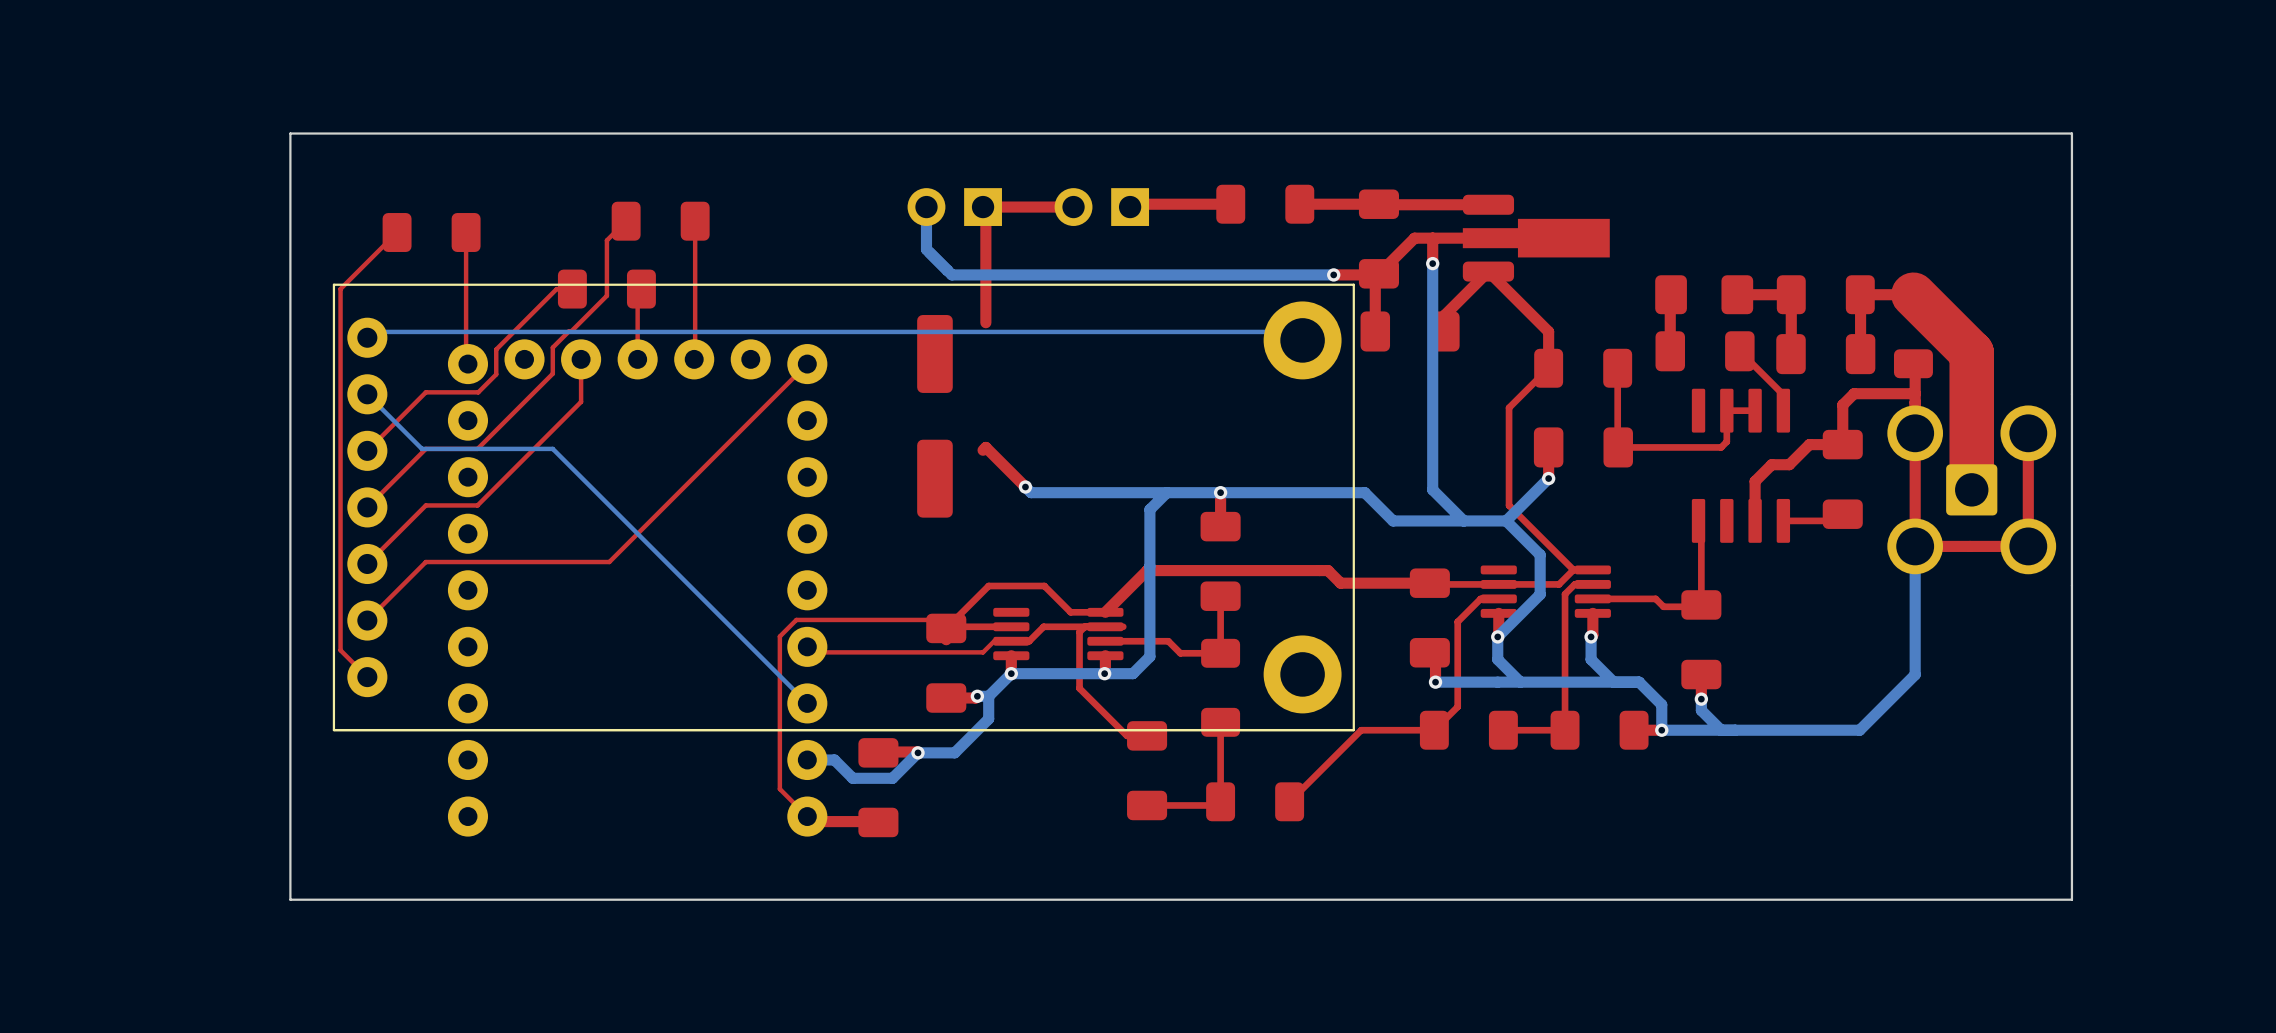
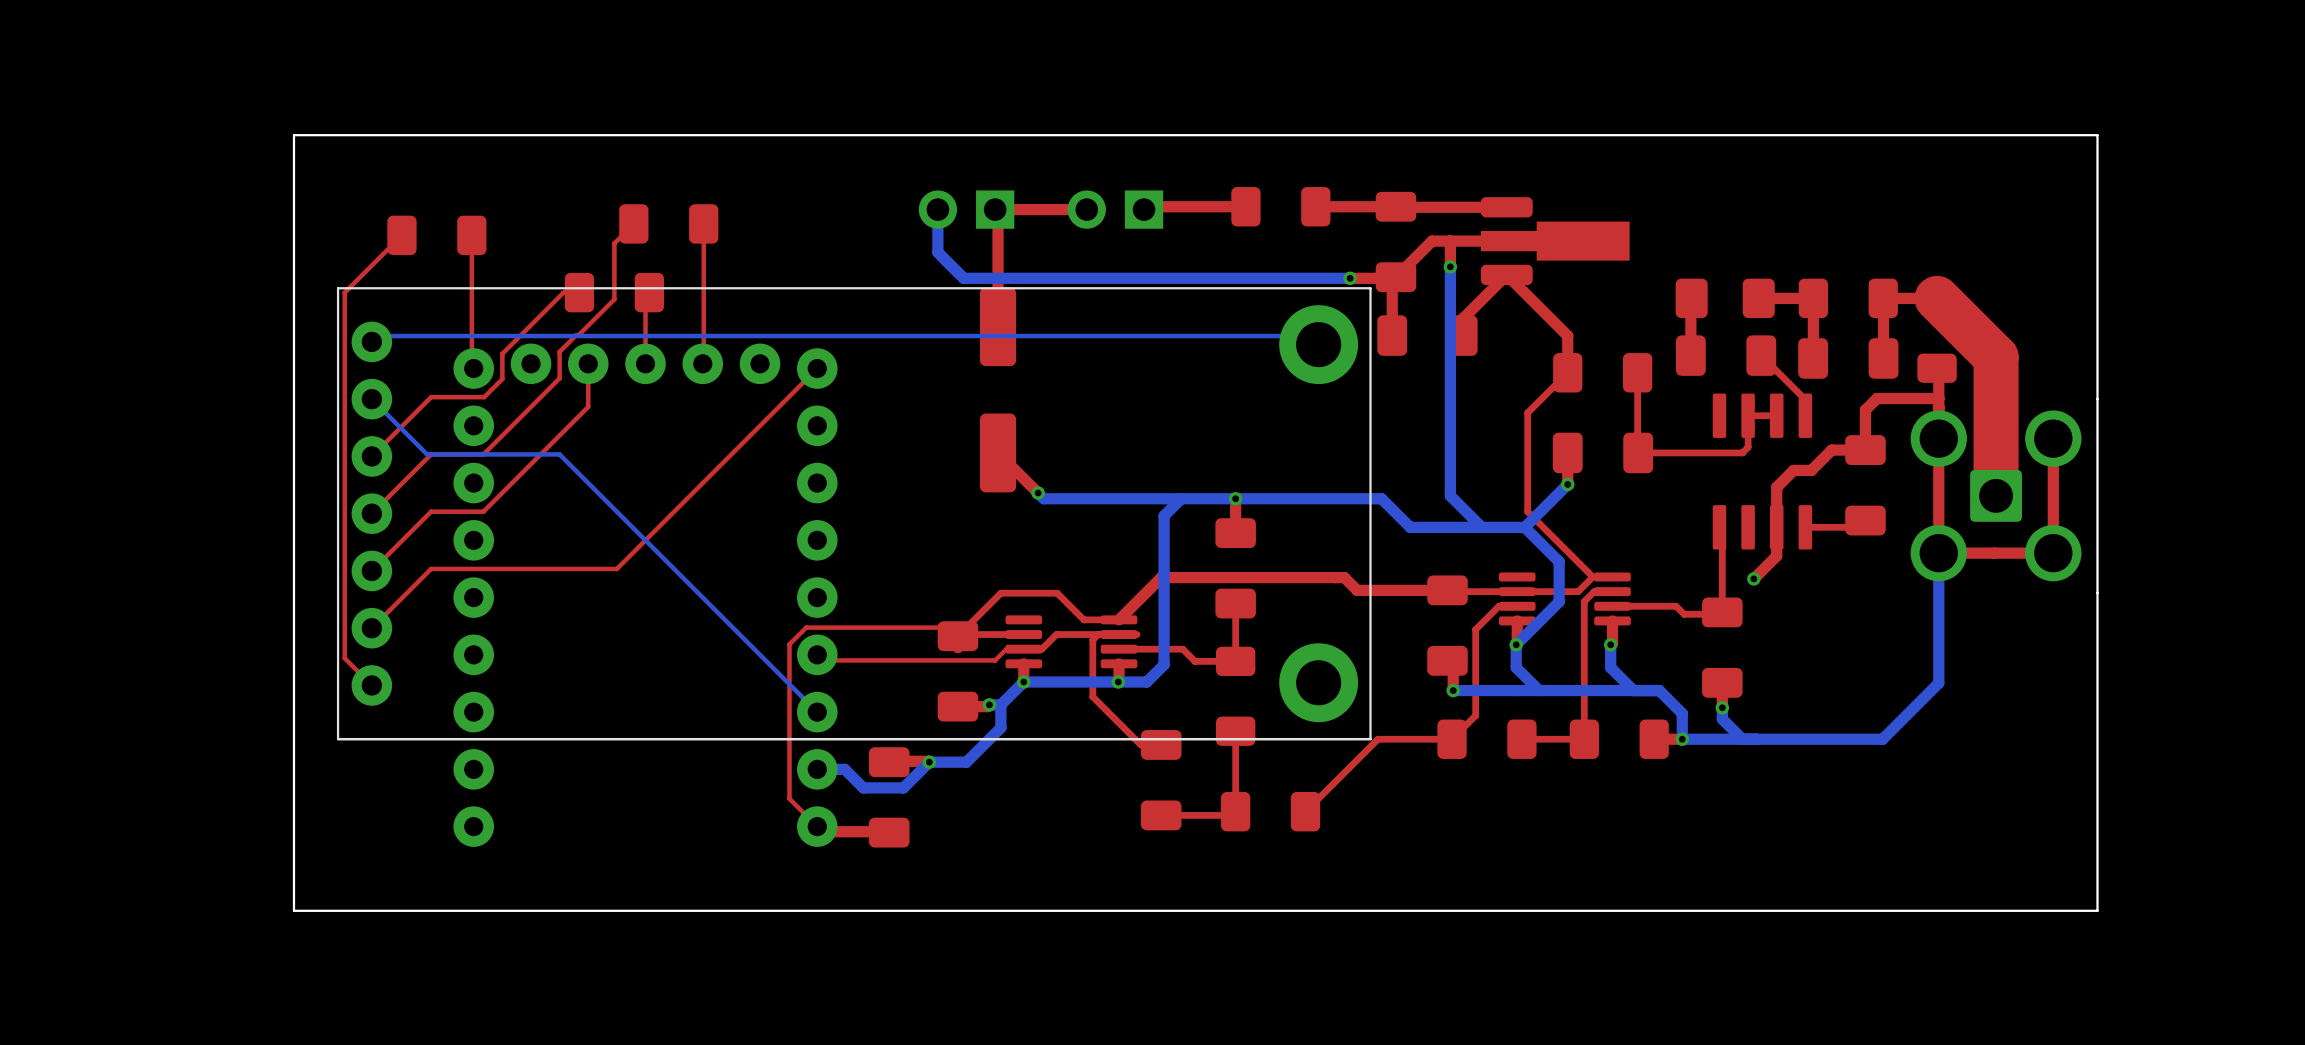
part position: (934, 416) -> (998, 389)
top track: none -> (1776, 527) (1776, 556) (1753, 578)
via: none -> (1753, 578)

